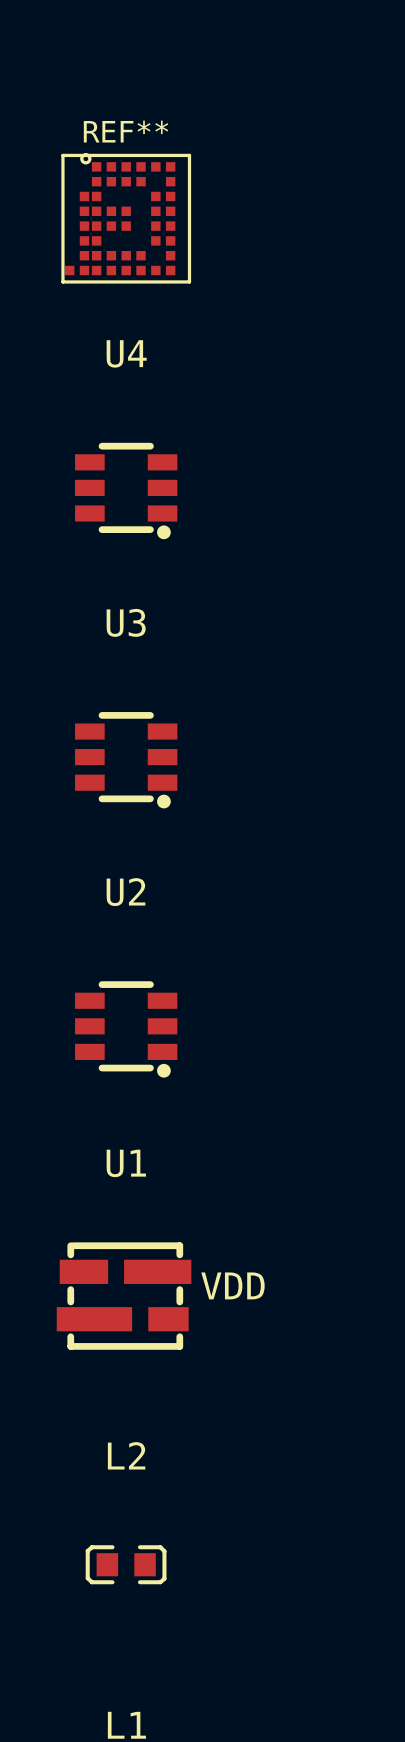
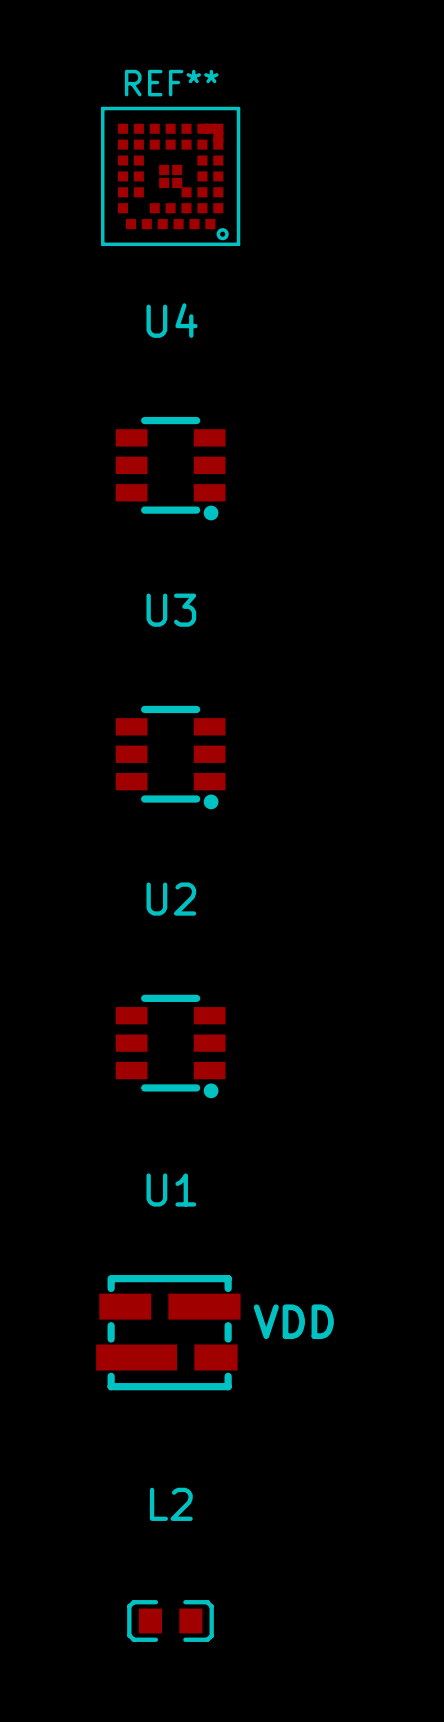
REF** footprint: [61, 153, 192, 284] -> [101, 106, 241, 247]

